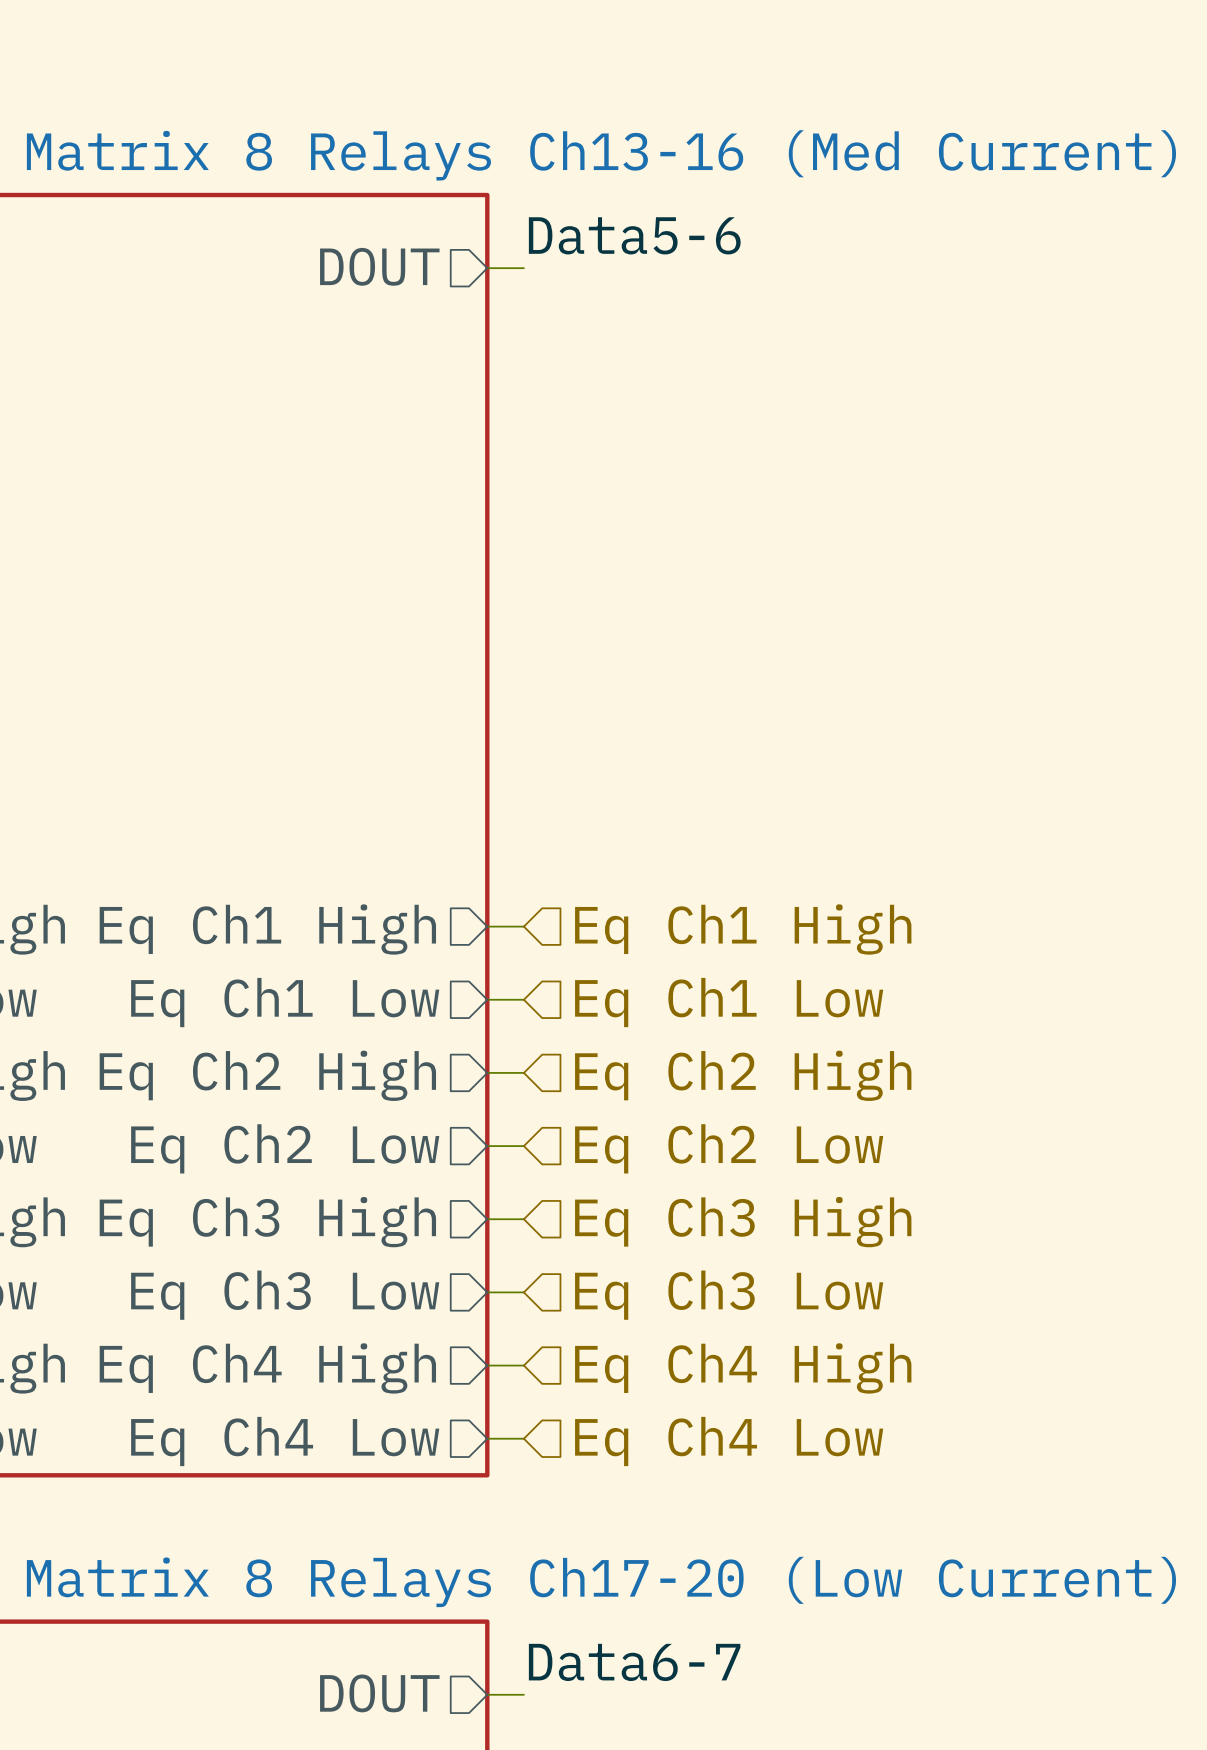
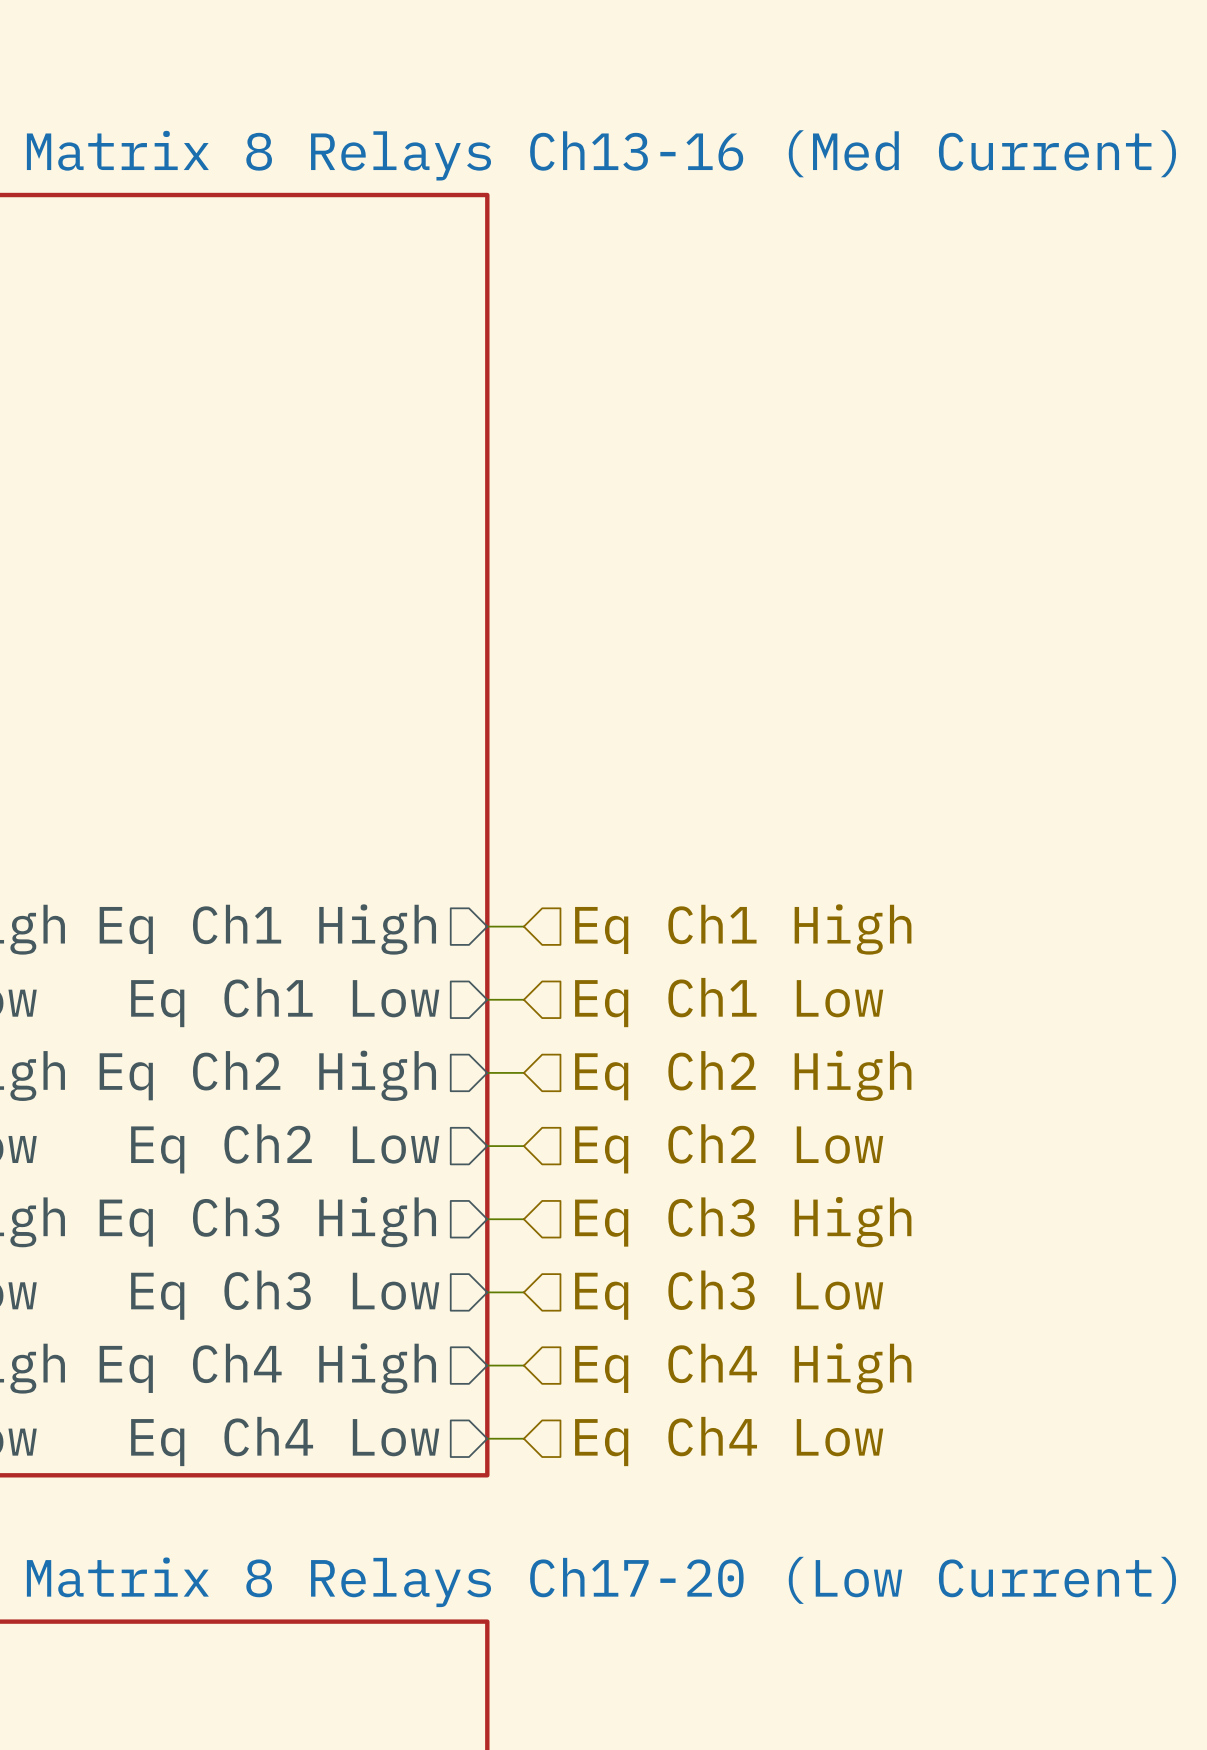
label: Data5-6 (634, 235) -> none
sheet pin: DOUT (379, 266) -> none
wire: (487, 268) (523, 268) -> none
label: Data6-7 (634, 1662) -> none
sheet pin: DOUT (379, 1693) -> none
wire: (487, 1694) (523, 1694) -> none

